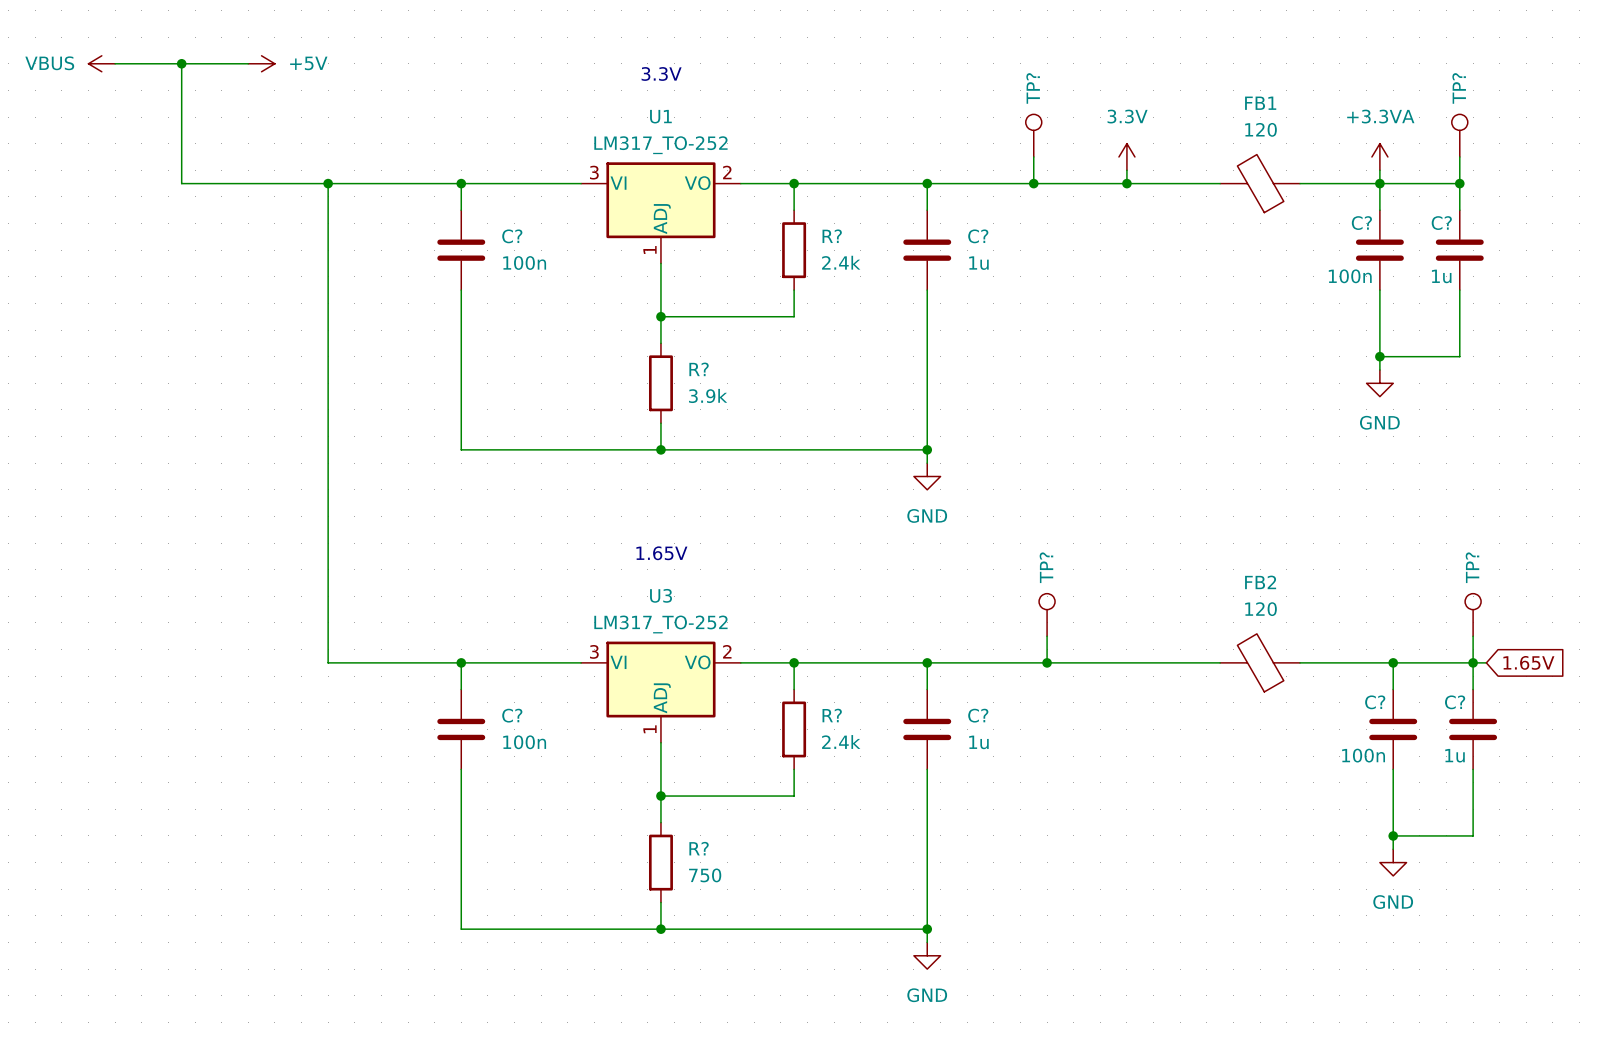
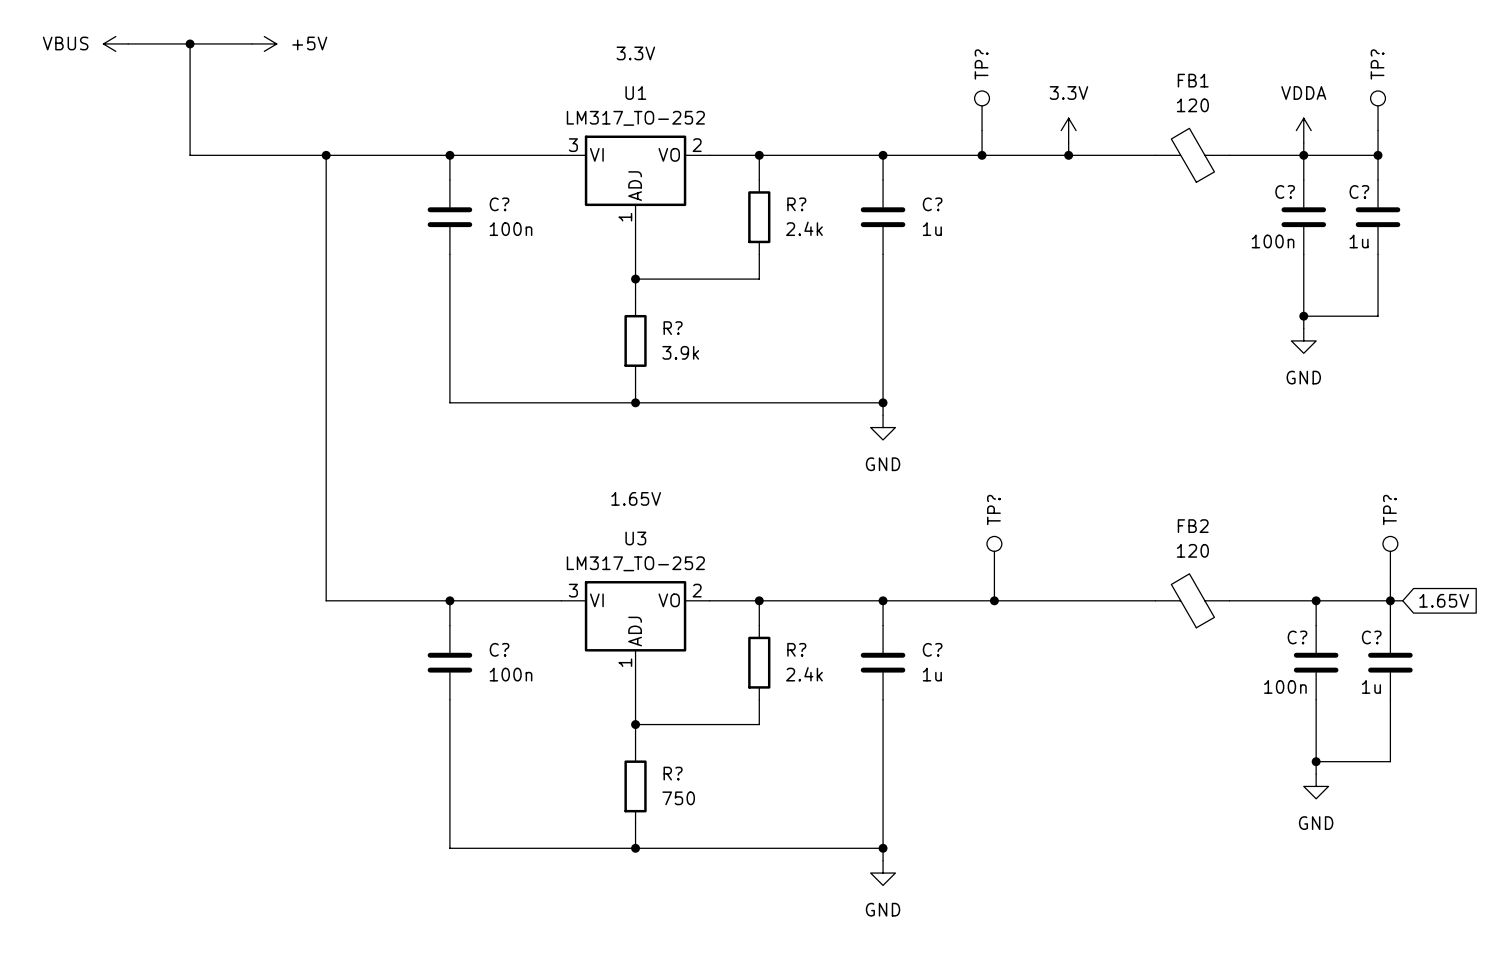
power symbol: +3.3VA (1379, 156) -> VDDA (1303, 130)

